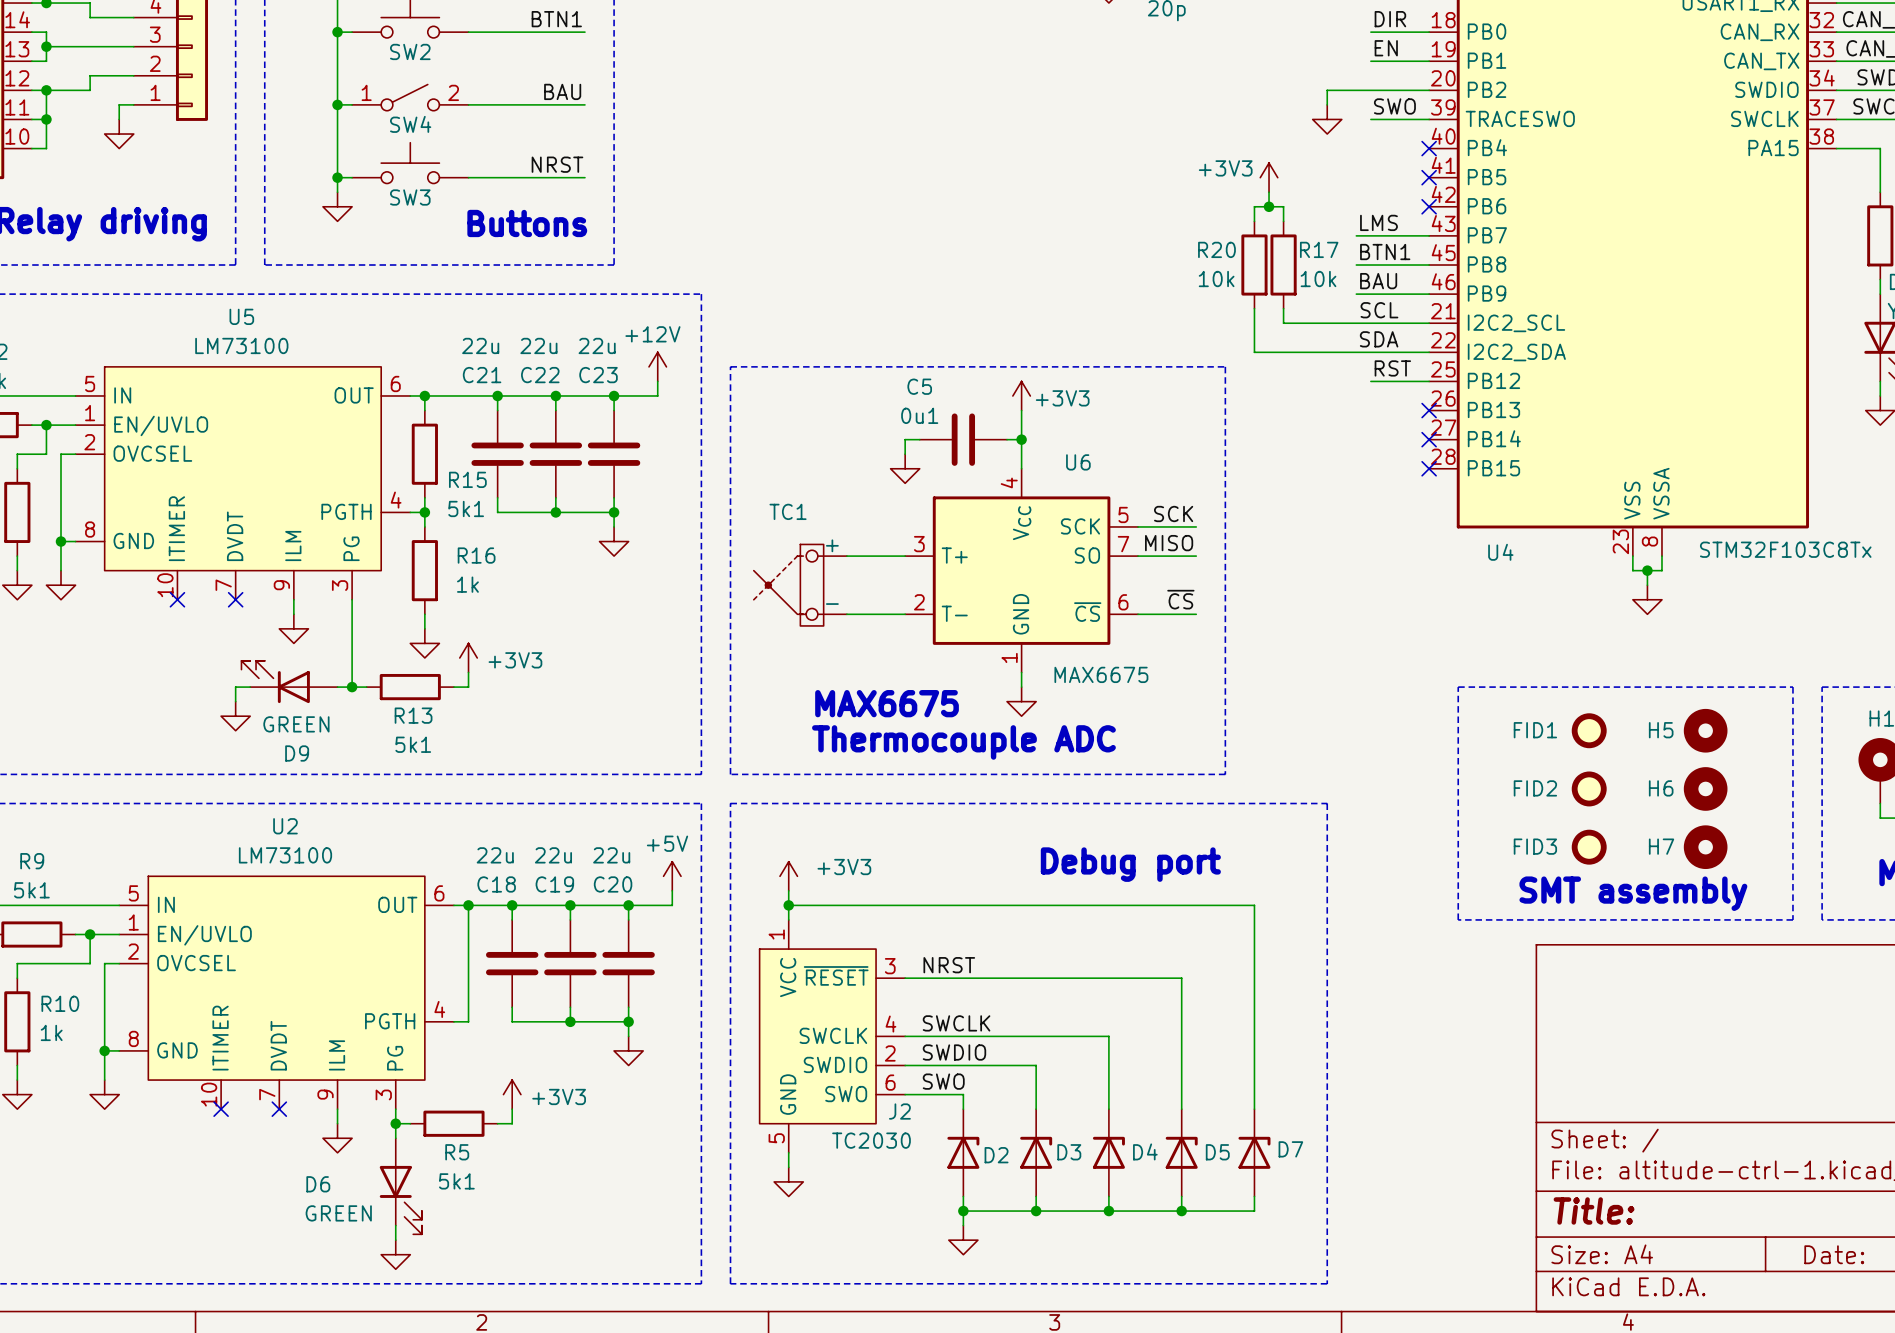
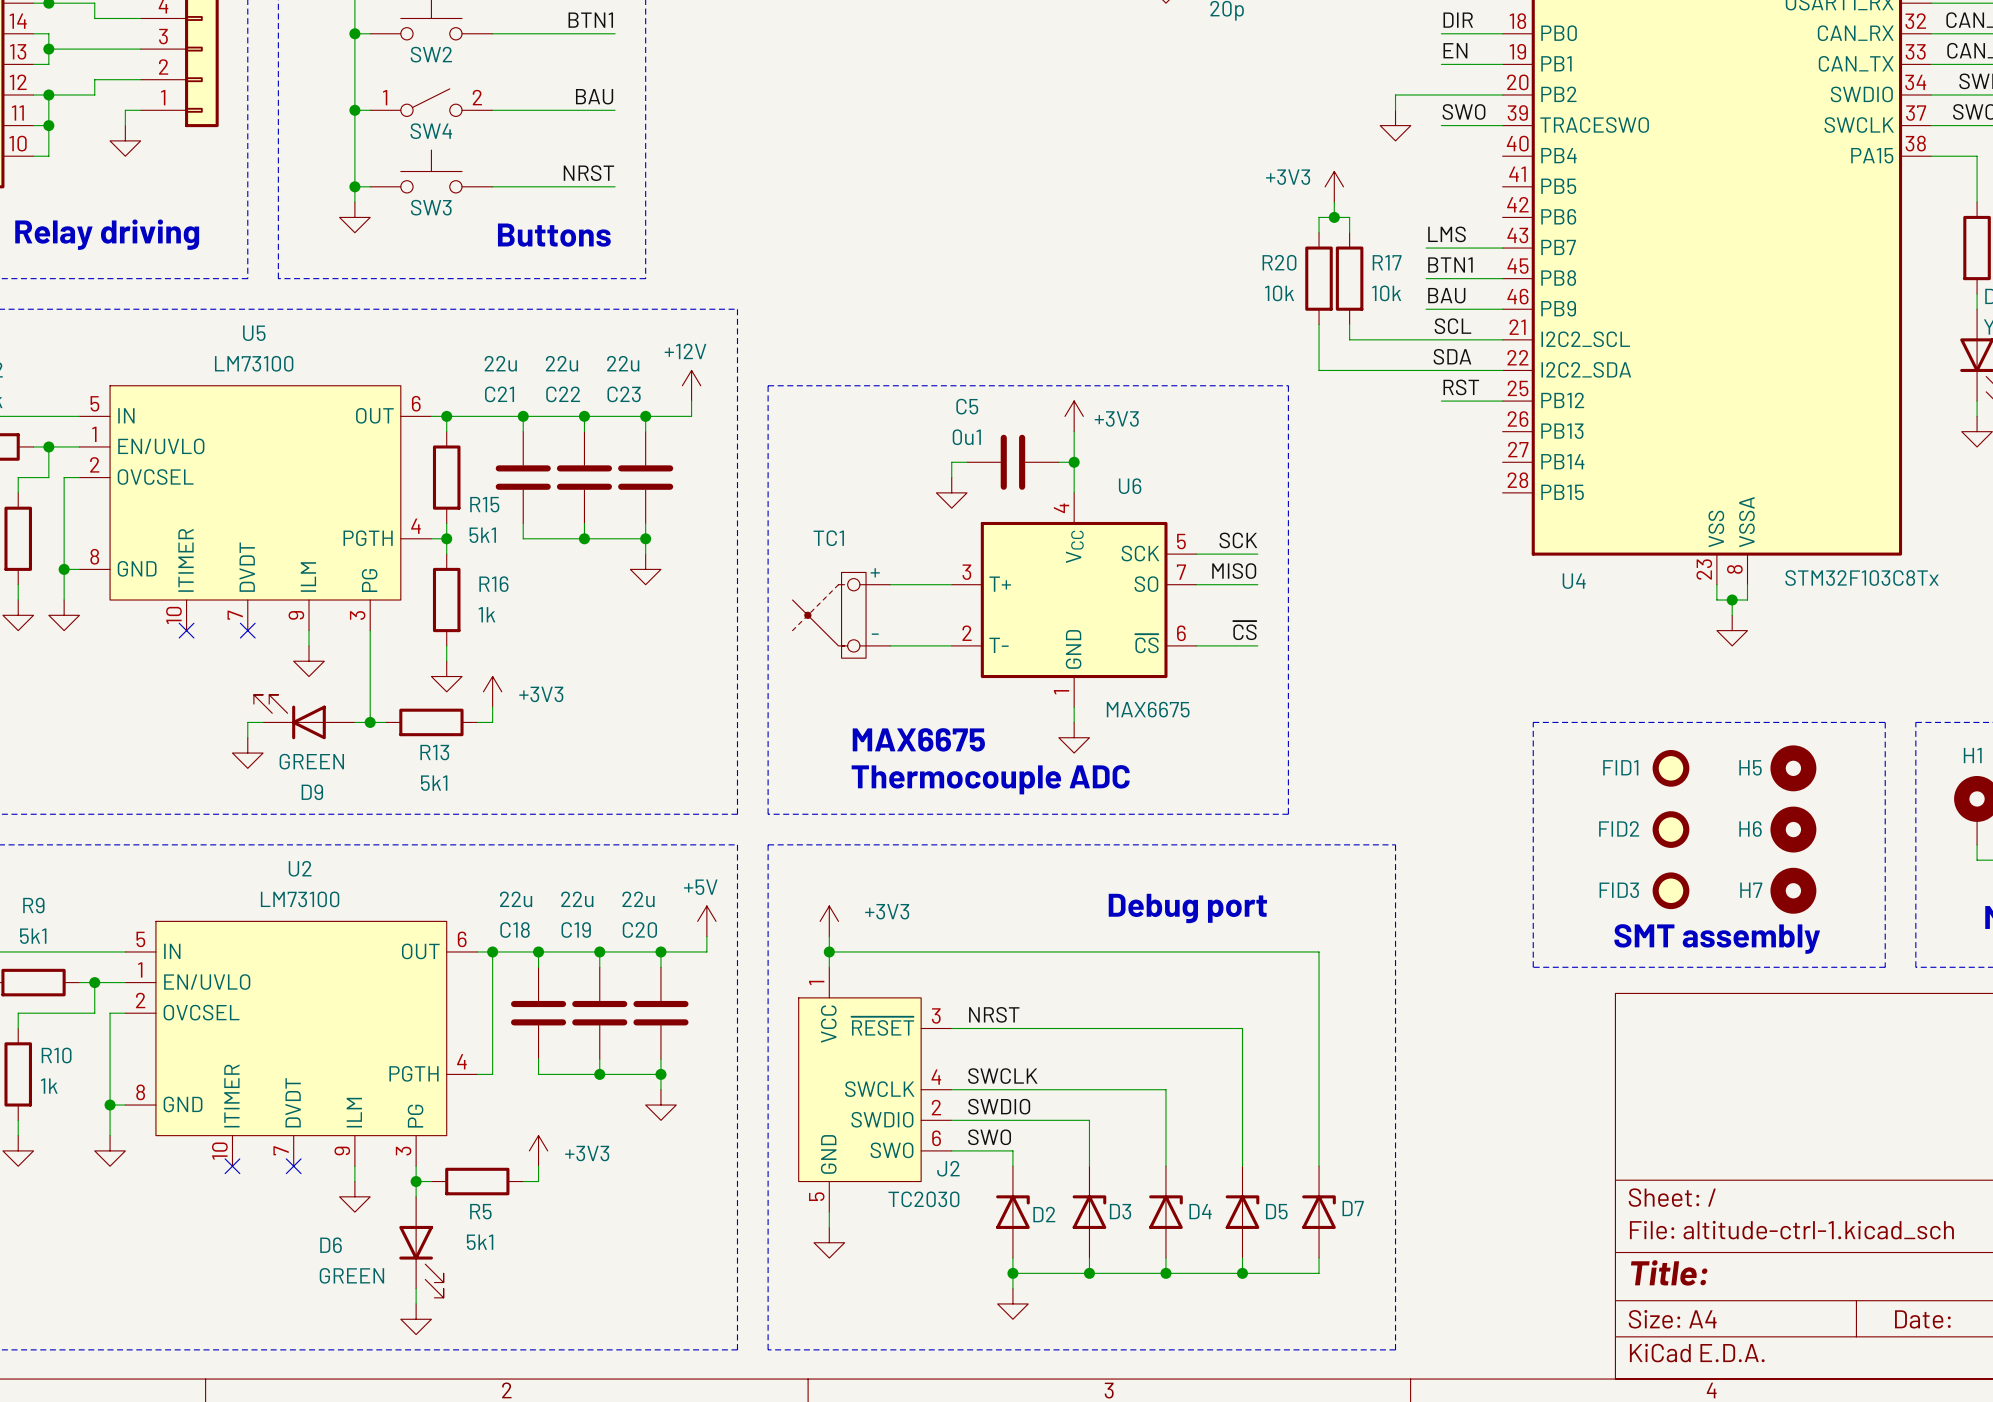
no-connect mark: (1429, 148) -> none
no-connect mark: (1429, 177) -> none
no-connect mark: (1429, 206) -> none
no-connect mark: (1429, 410) -> none
no-connect mark: (1429, 439) -> none
no-connect mark: (1429, 468) -> none

